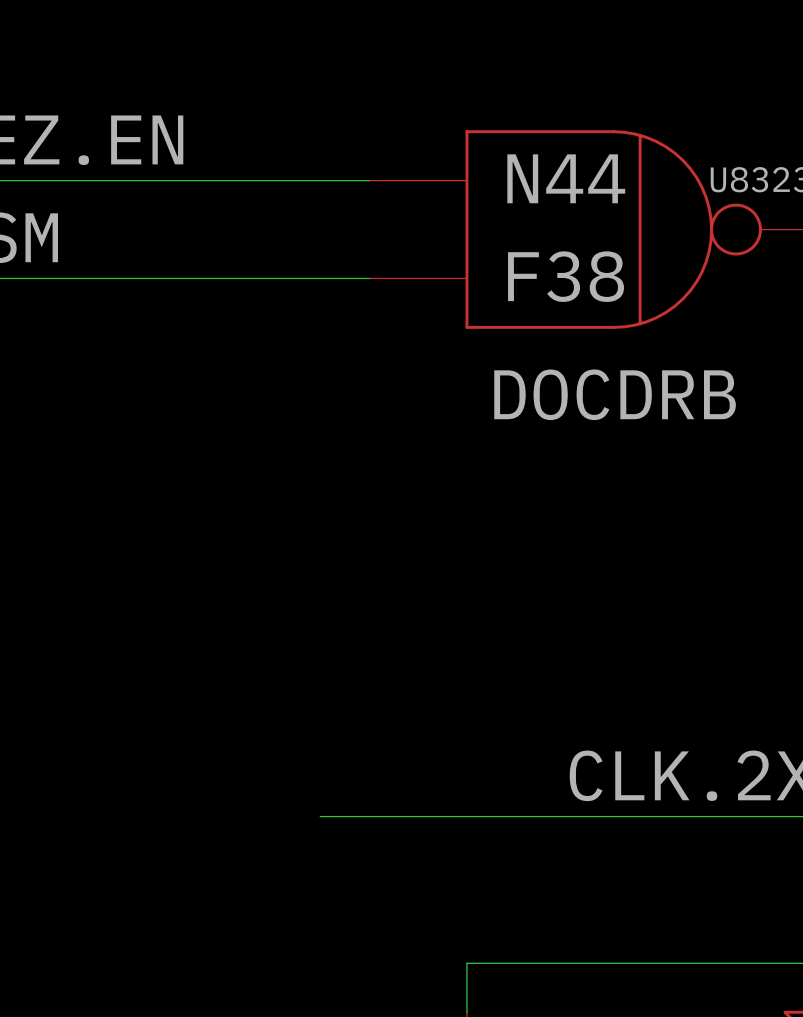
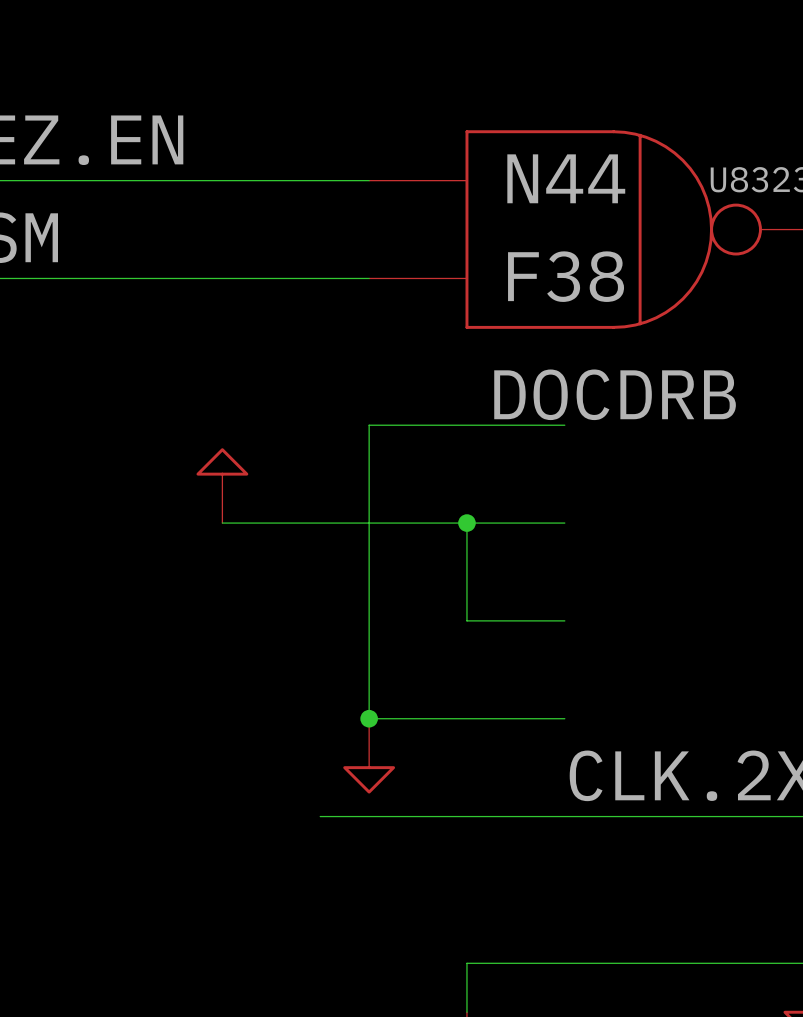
wire: none -> (564, 425) (369, 425) (369, 718) (564, 718)
power symbol: none -> (222, 485)
wire: none -> (222, 523) (564, 523)
wire: none -> (466, 523) (466, 620) (564, 620)
junction: none -> (466, 523)
junction: none -> (369, 718)
power symbol: none -> (369, 756)

